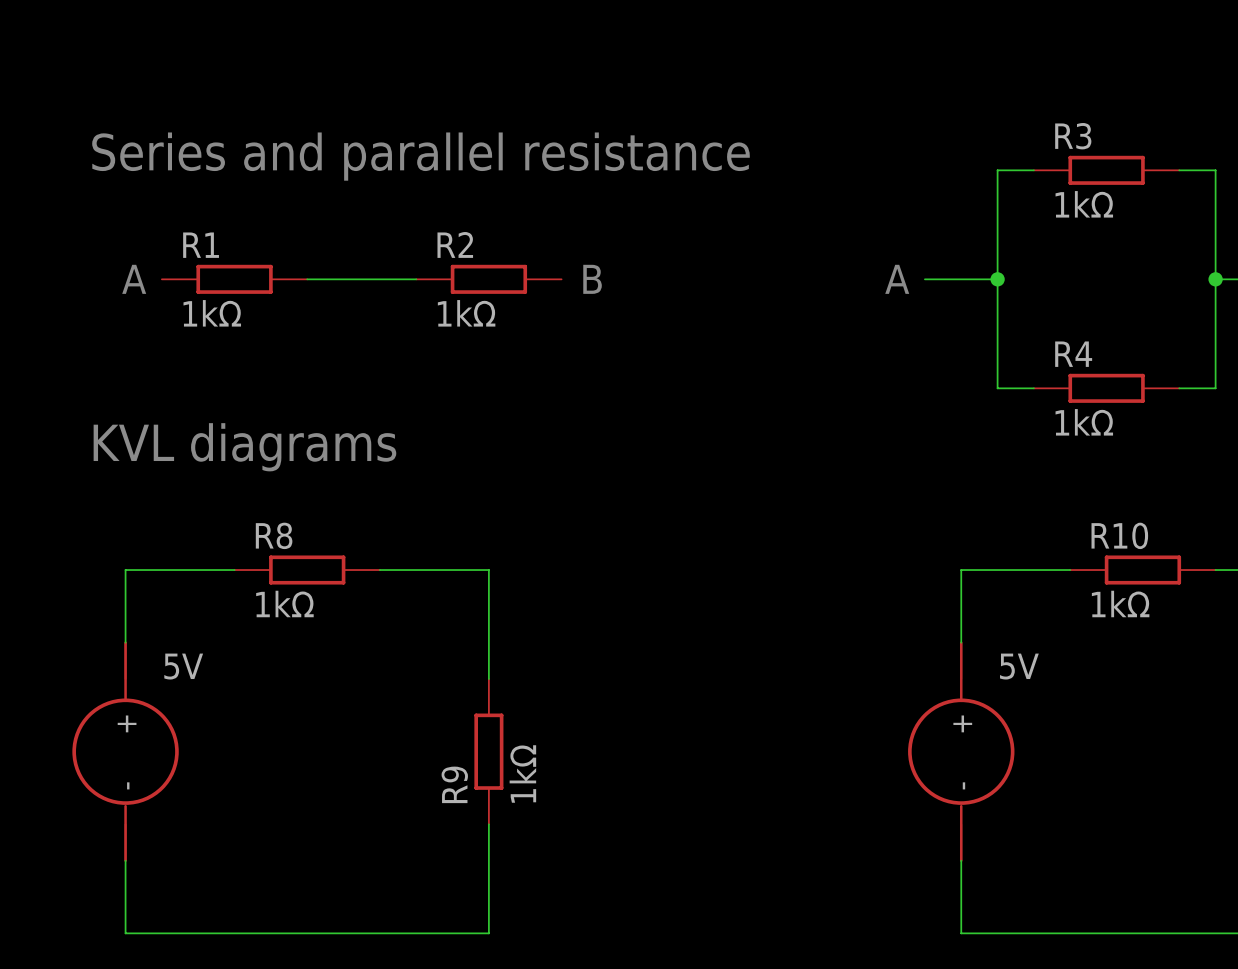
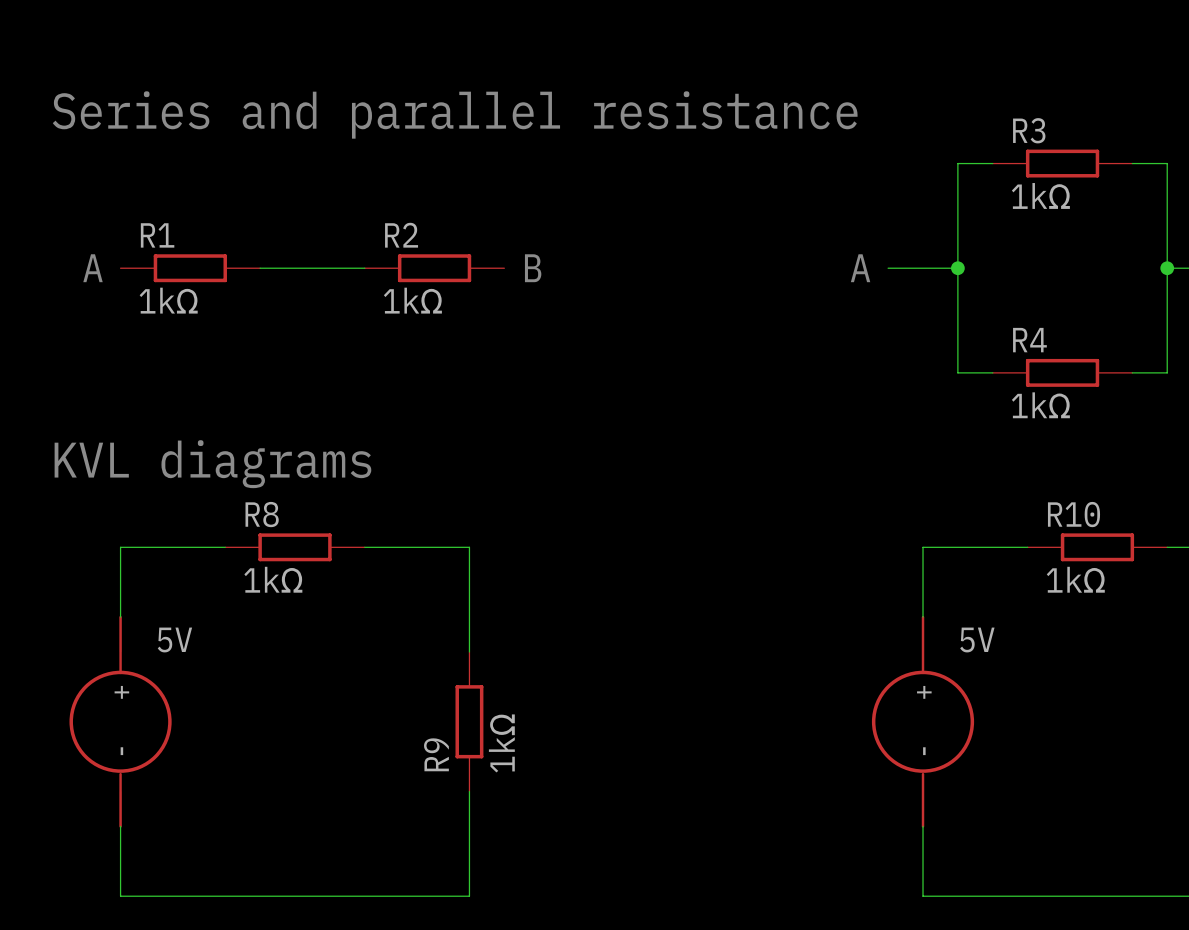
text position: Series and parallel resistance (420, 156) -> Series and parallel resistance (455, 114)
text position: A (134, 279) -> A (93, 268)
R1 position: (234, 279) -> (190, 268)
R2 position: (488, 279) -> (434, 268)
text position: B (592, 279) -> B (533, 268)
text position: KVL diagrams (244, 447) -> KVL diagrams (212, 464)

